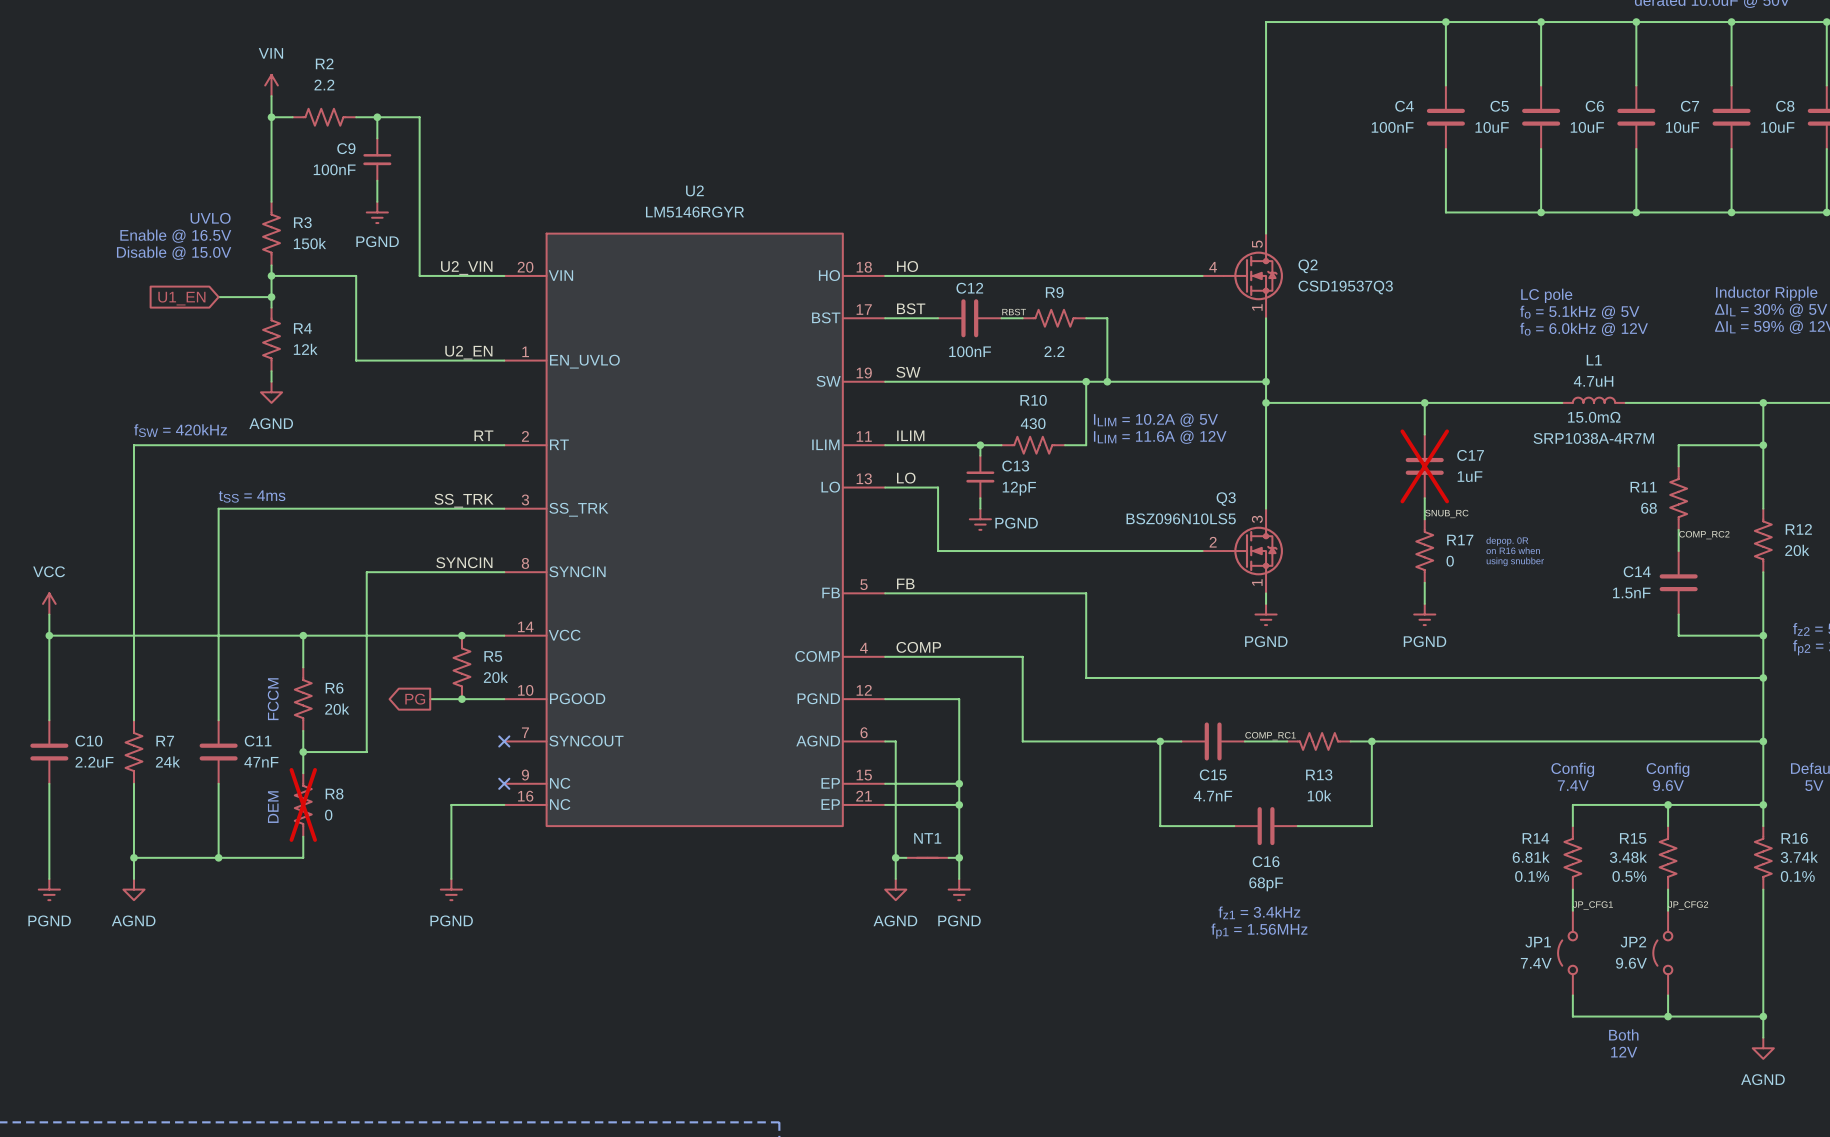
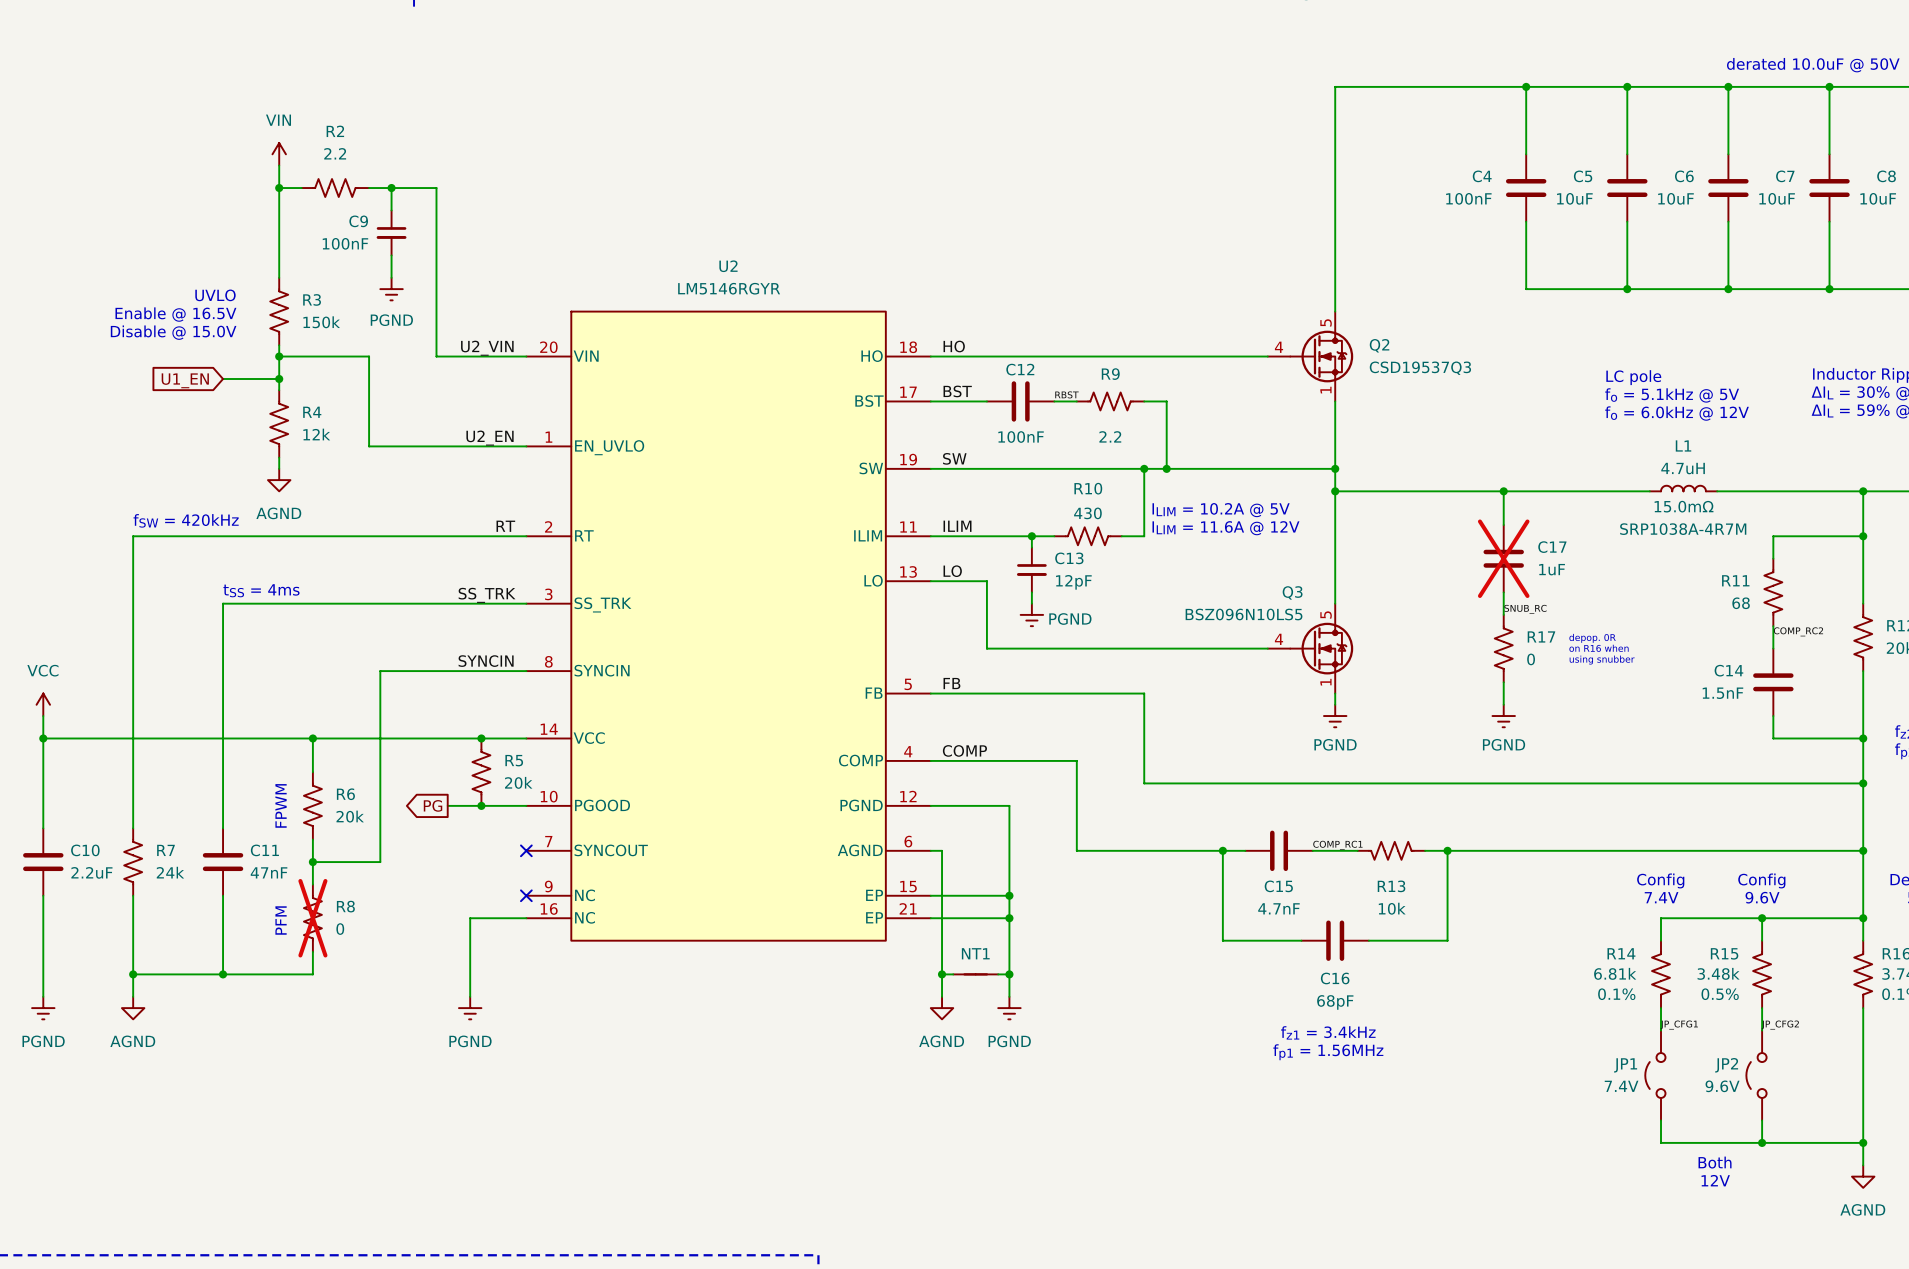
Q3 pin number: 3 (1257, 519) -> 5 (1326, 614)
Q3 pin number: 2 (1213, 542) -> 4 (1278, 639)
text: FCCM (273, 699) -> FPWM (281, 805)
text: DEM (273, 807) -> PFM (281, 920)

